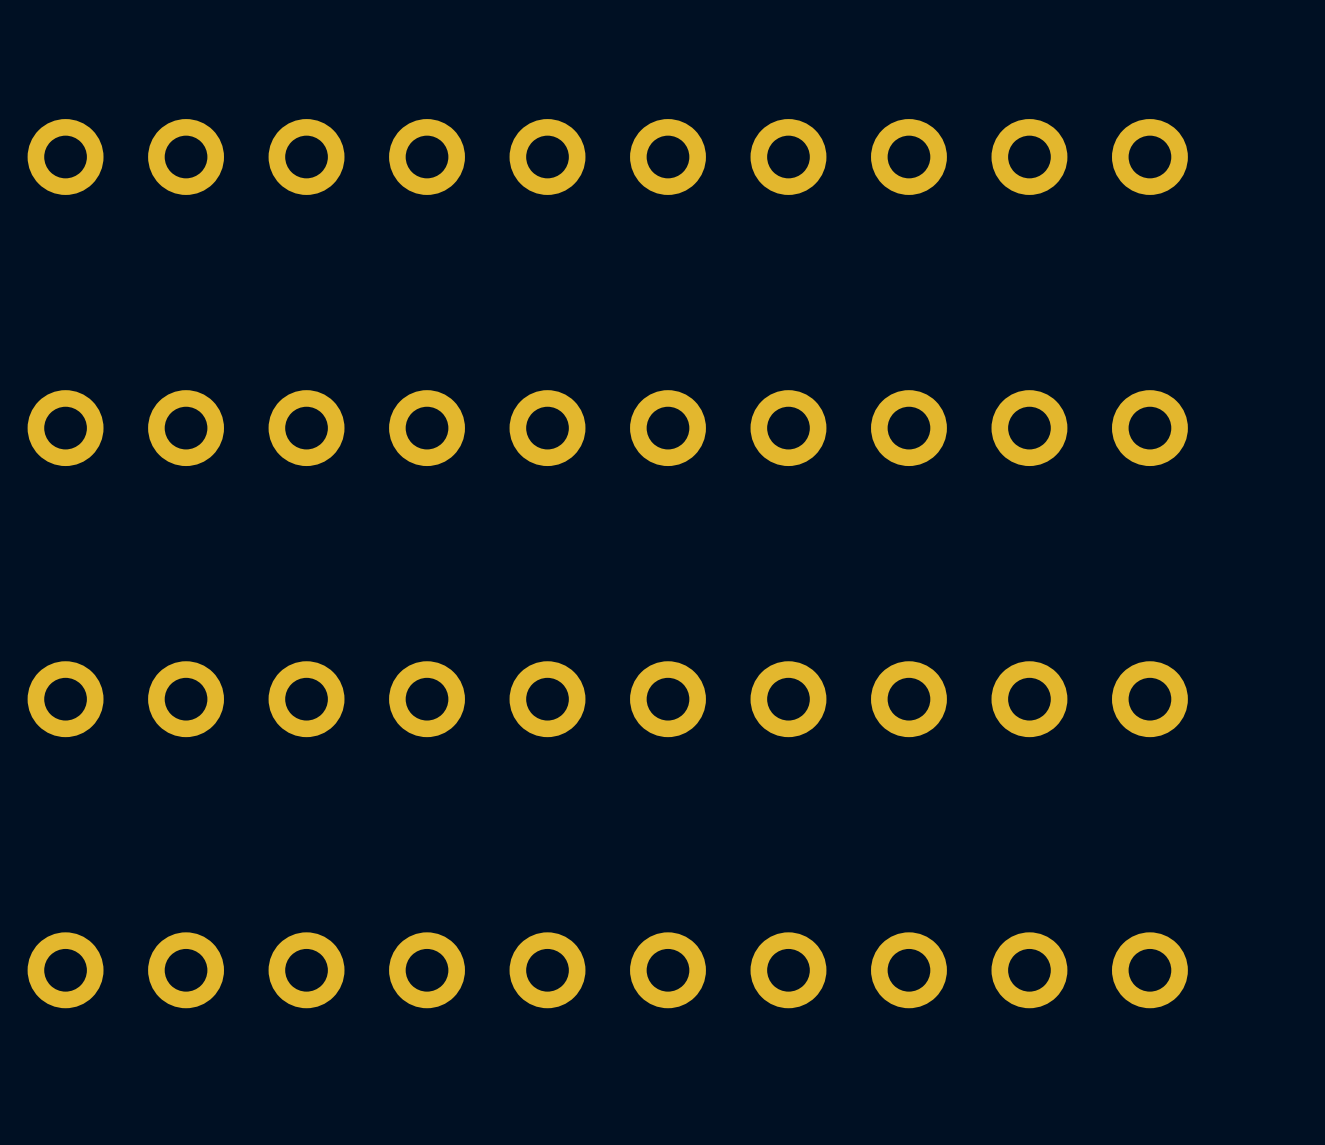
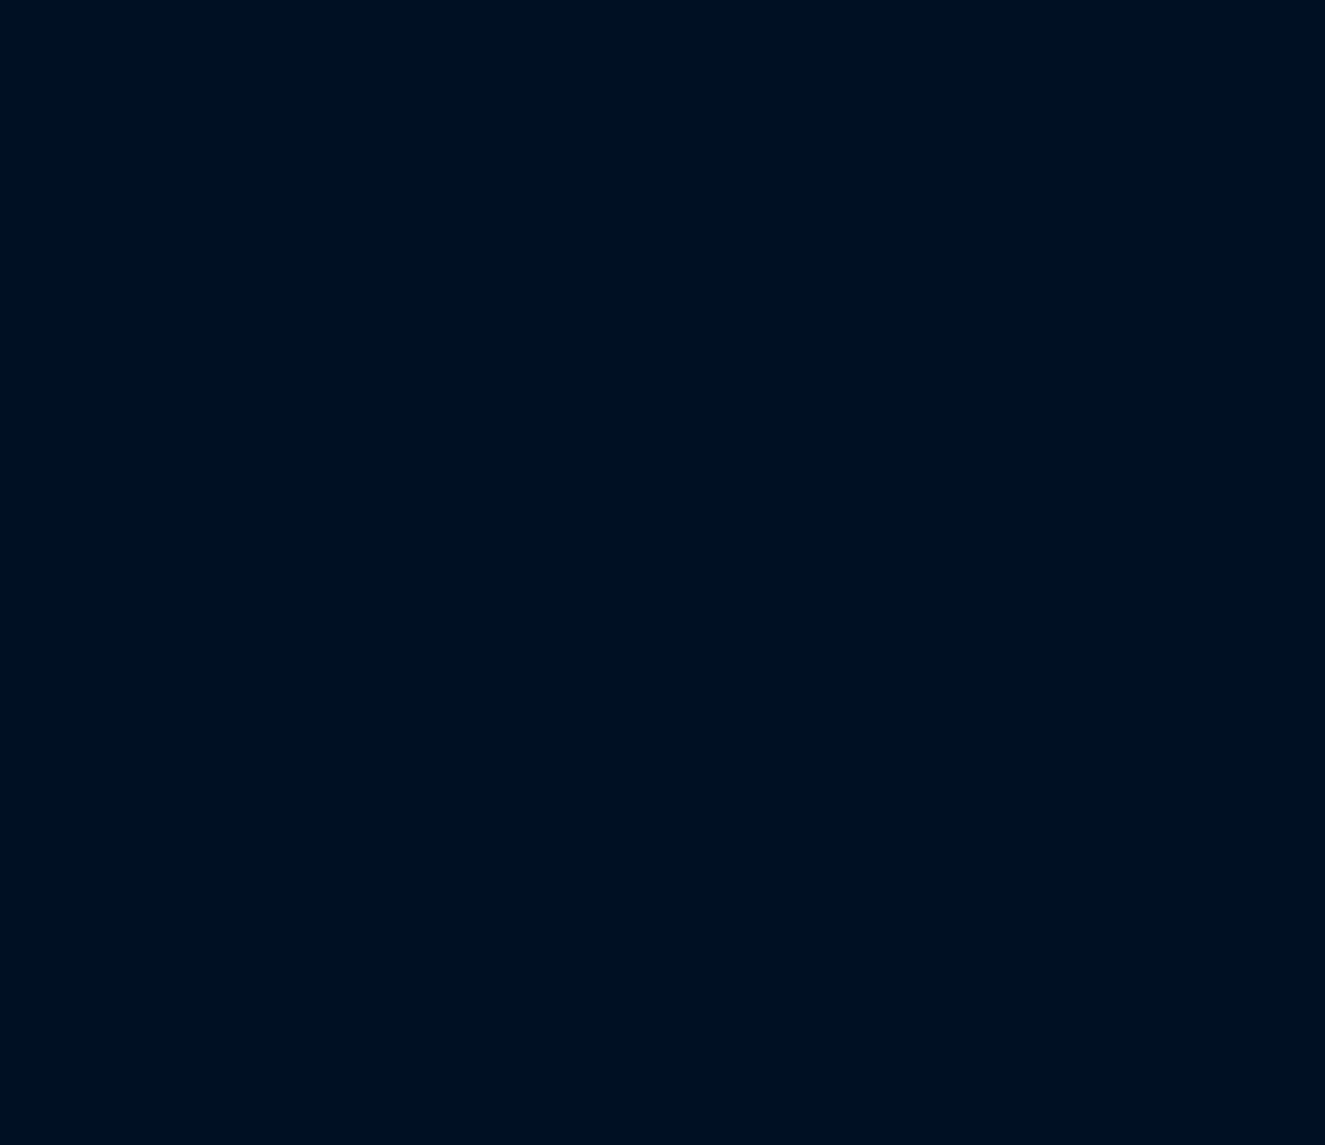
part: (125, 157) -> none
part: (366, 157) -> none
part: (607, 157) -> none
part: (848, 157) -> none
part: (1089, 157) -> none
part: (125, 428) -> none
part: (366, 428) -> none
part: (607, 428) -> none
part: (848, 428) -> none
part: (1089, 428) -> none
part: (125, 699) -> none
part: (366, 699) -> none
part: (607, 699) -> none
part: (848, 699) -> none
part: (1089, 699) -> none
part: (125, 970) -> none
part: (366, 970) -> none
part: (607, 970) -> none
part: (848, 970) -> none
part: (1089, 970) -> none

